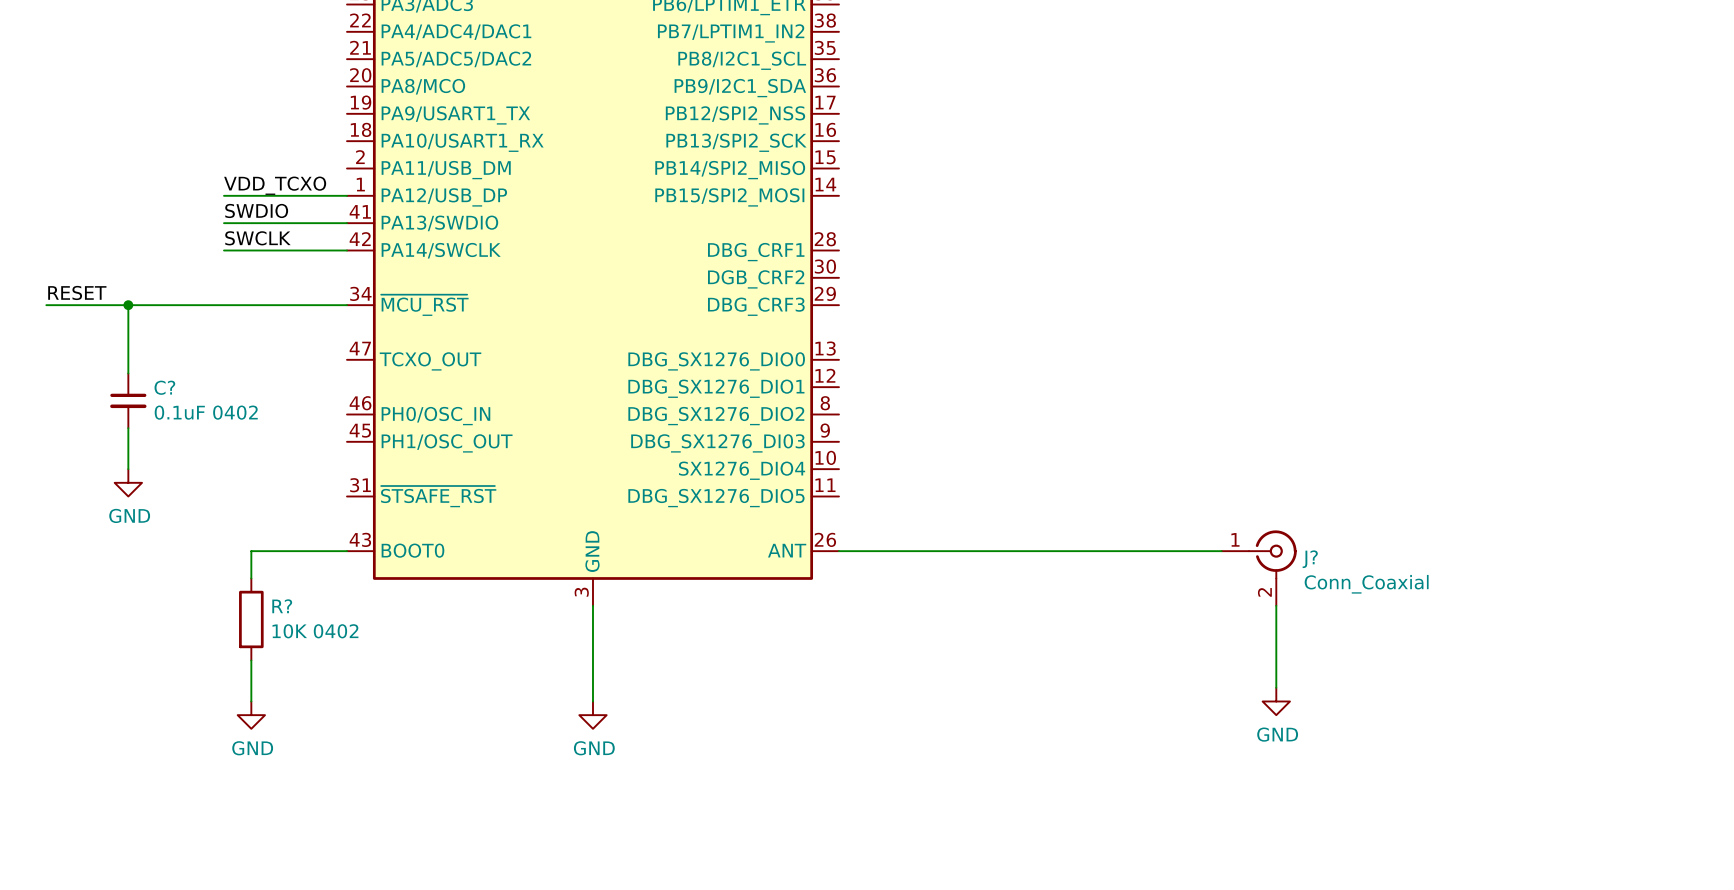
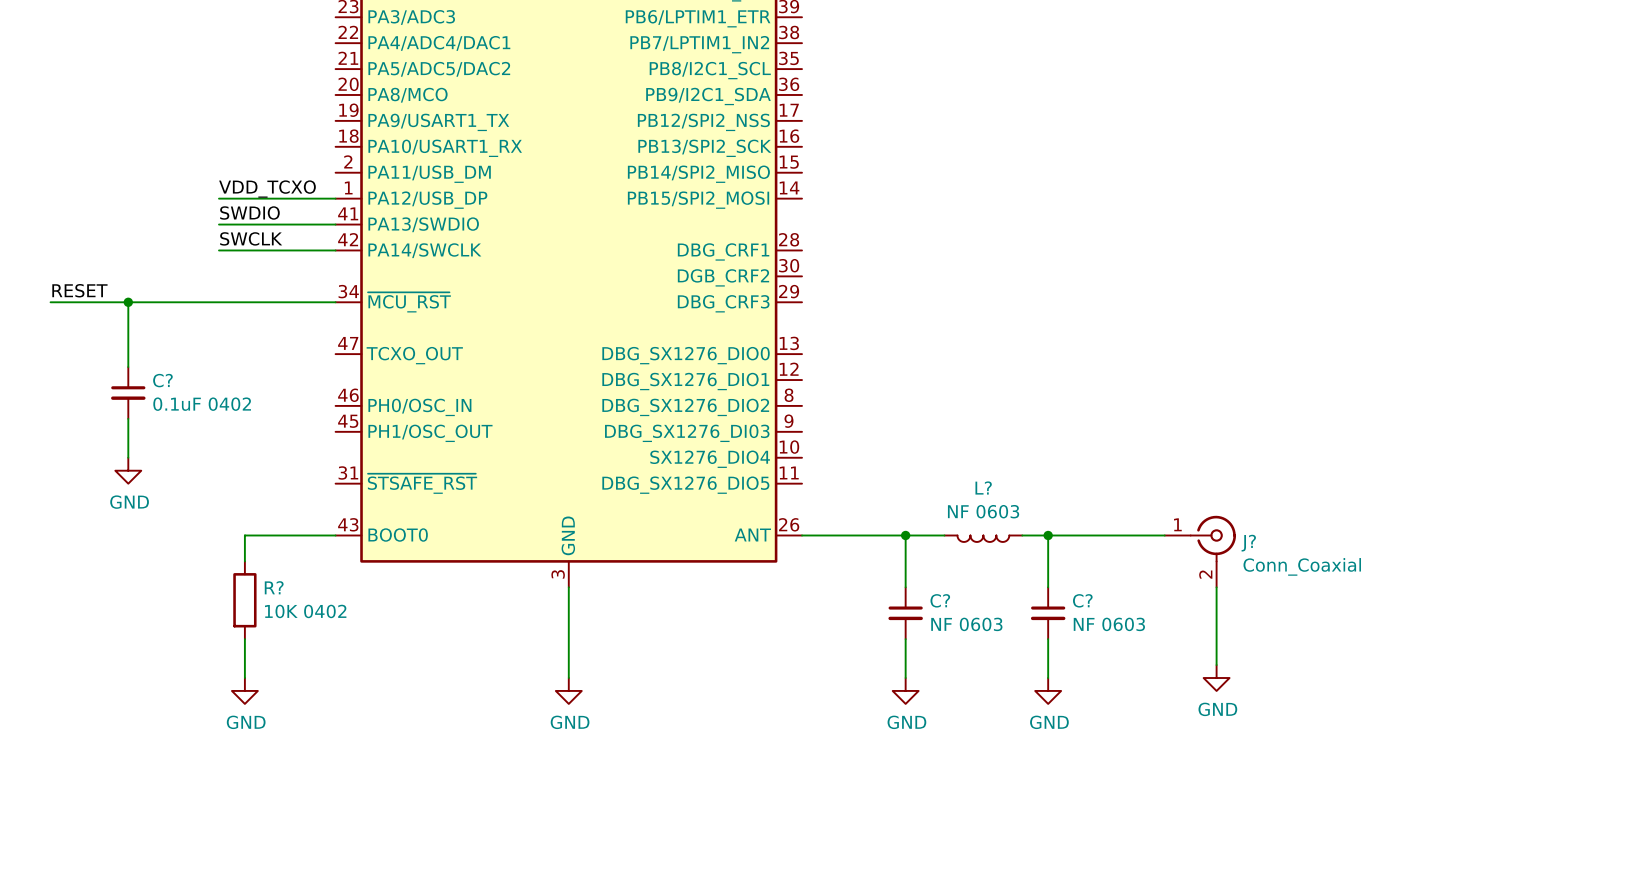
wire: none -> (905, 535) (905, 587)
junction: none -> (905, 535)
wire: (989, 551) (1071, 551) -> none
wire: none -> (1048, 535) (1048, 587)
junction: none -> (1048, 535)
L?: none -> NF 0603 (983, 538)
C?: none -> NF 0603 (905, 613)
C?: none -> NF 0603 (1048, 613)
wire: none -> (905, 639) (905, 678)
wire: none -> (1048, 639) (1048, 678)
power symbol: none -> GND (905, 690)
power symbol: none -> GND (1048, 690)

